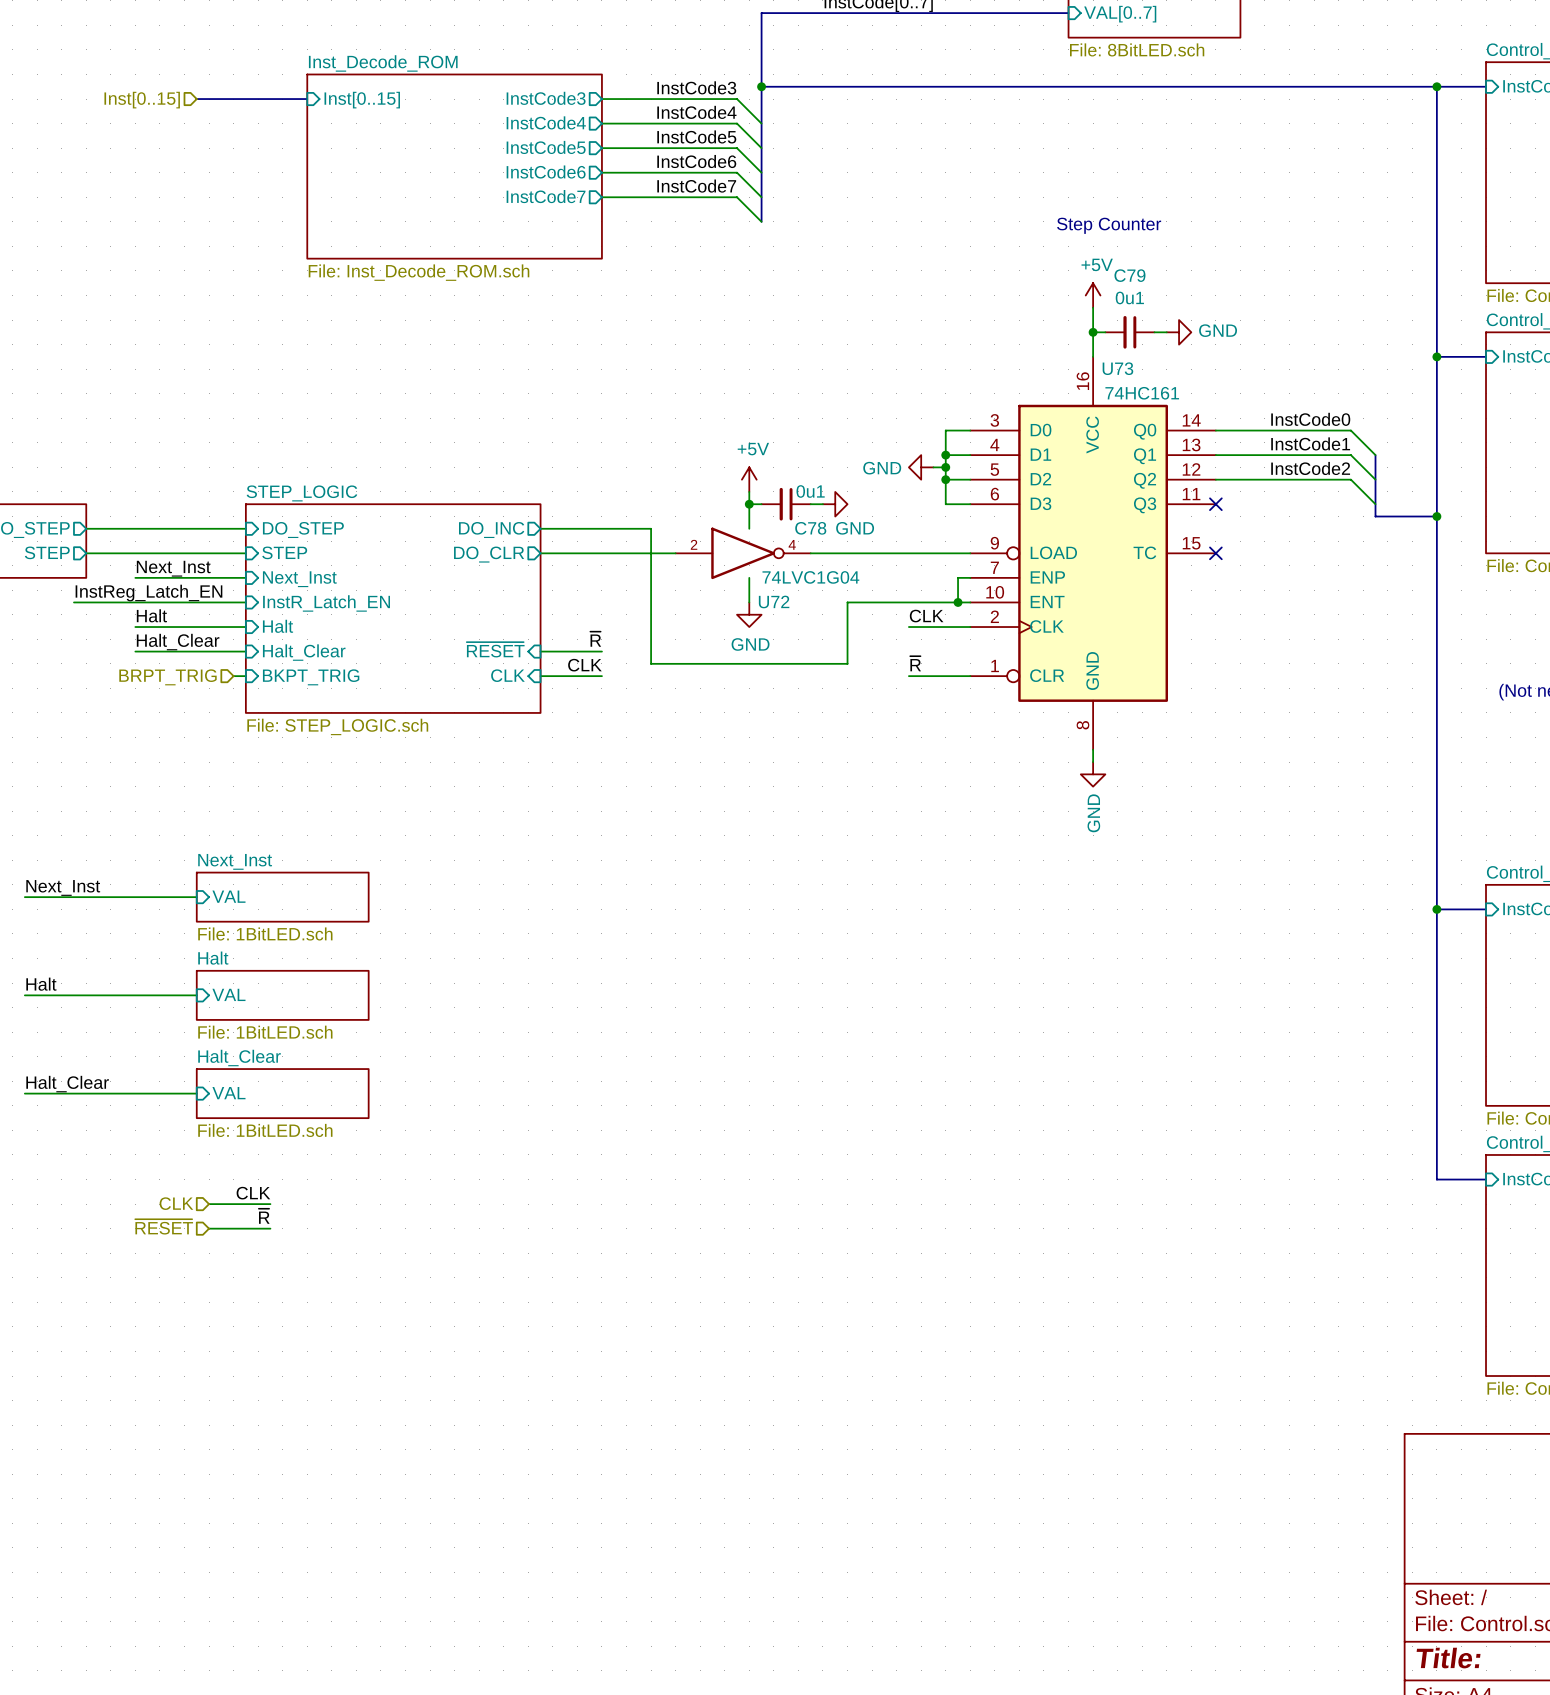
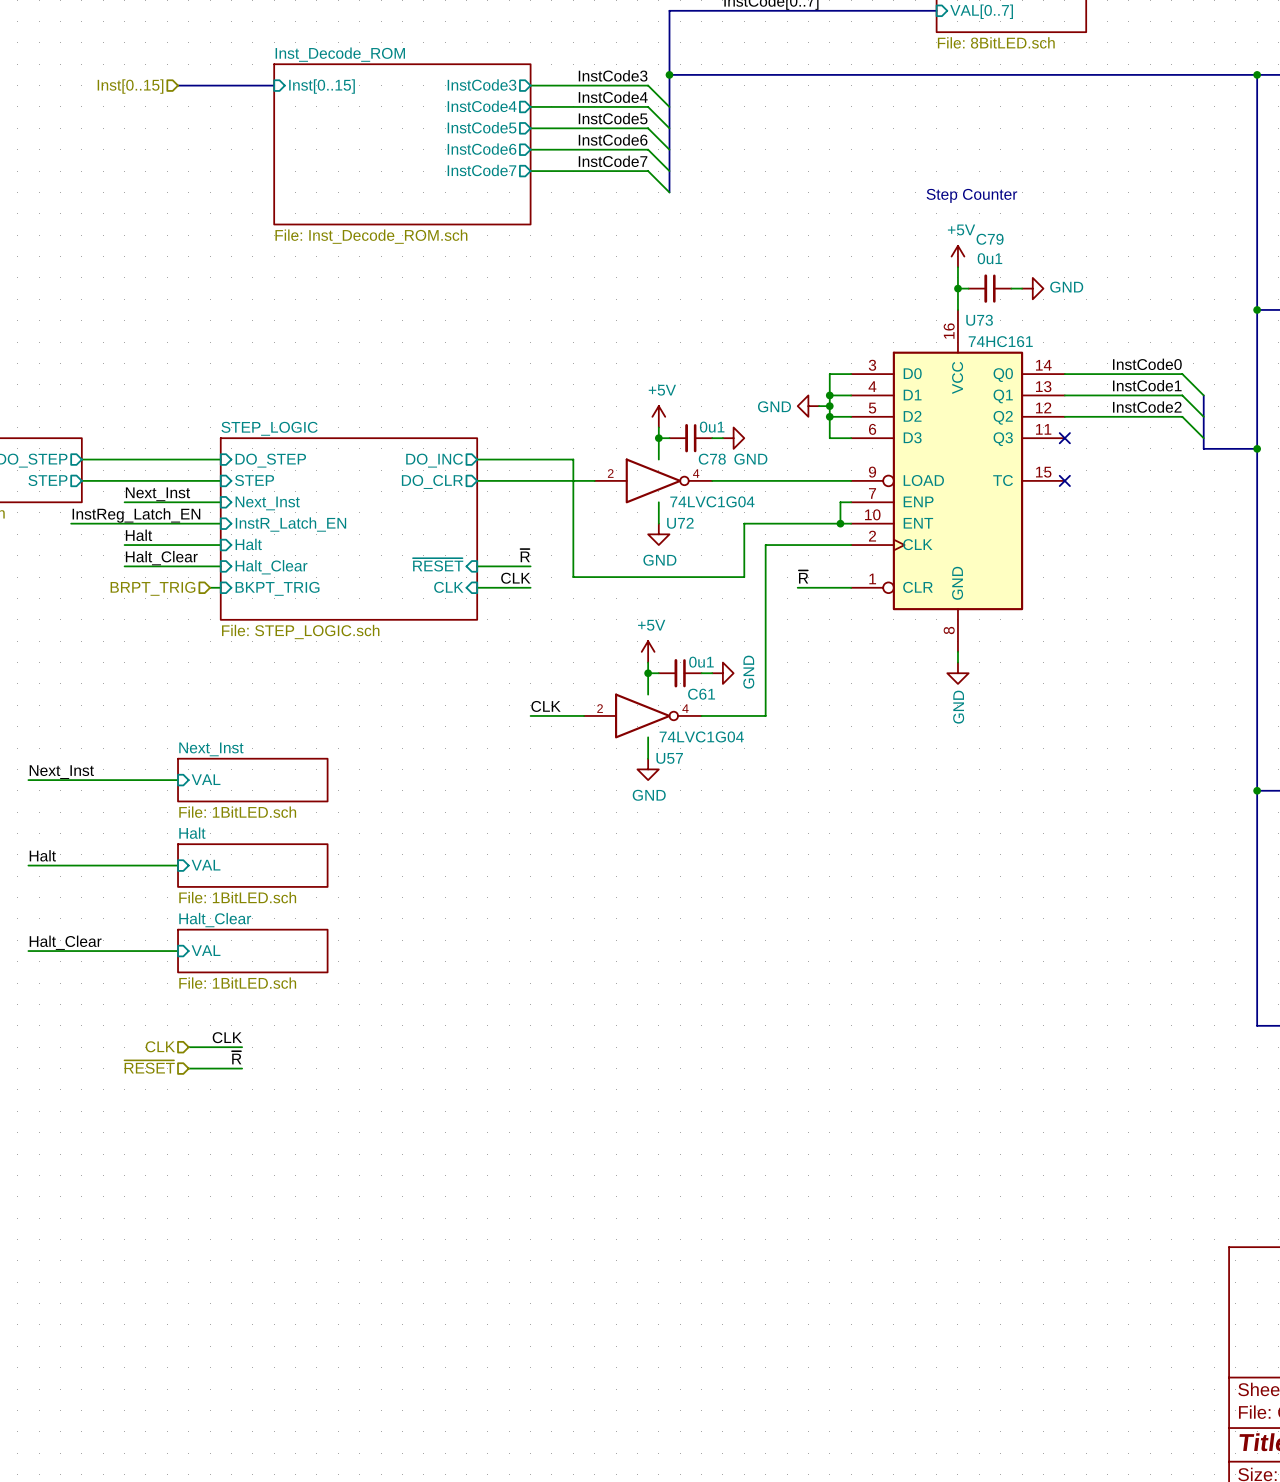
label: CLK (926, 616) -> none
wire: none -> (797, 545) (765, 545) (765, 715) (701, 715)
power symbol: none -> +5V (648, 651)
wire: none -> (648, 662) (648, 694)
wire: none -> (648, 673) (658, 673)
junction: none -> (648, 673)
C61: none -> 0u1 (680, 673)
wire: none -> (701, 673) (712, 673)
power symbol: none -> GND (722, 673)
label: none -> CLK (546, 706)
wire: none -> (530, 715) (584, 715)
U57: none -> 74LVC1G04 (642, 715)
wire: none -> (648, 737) (648, 758)
power symbol: none -> GND (648, 769)

